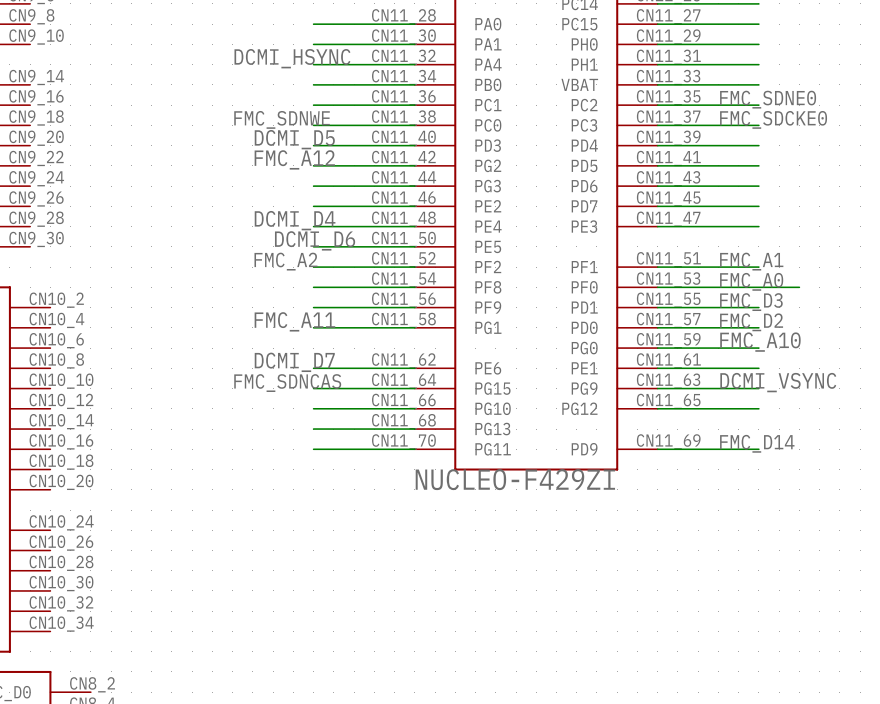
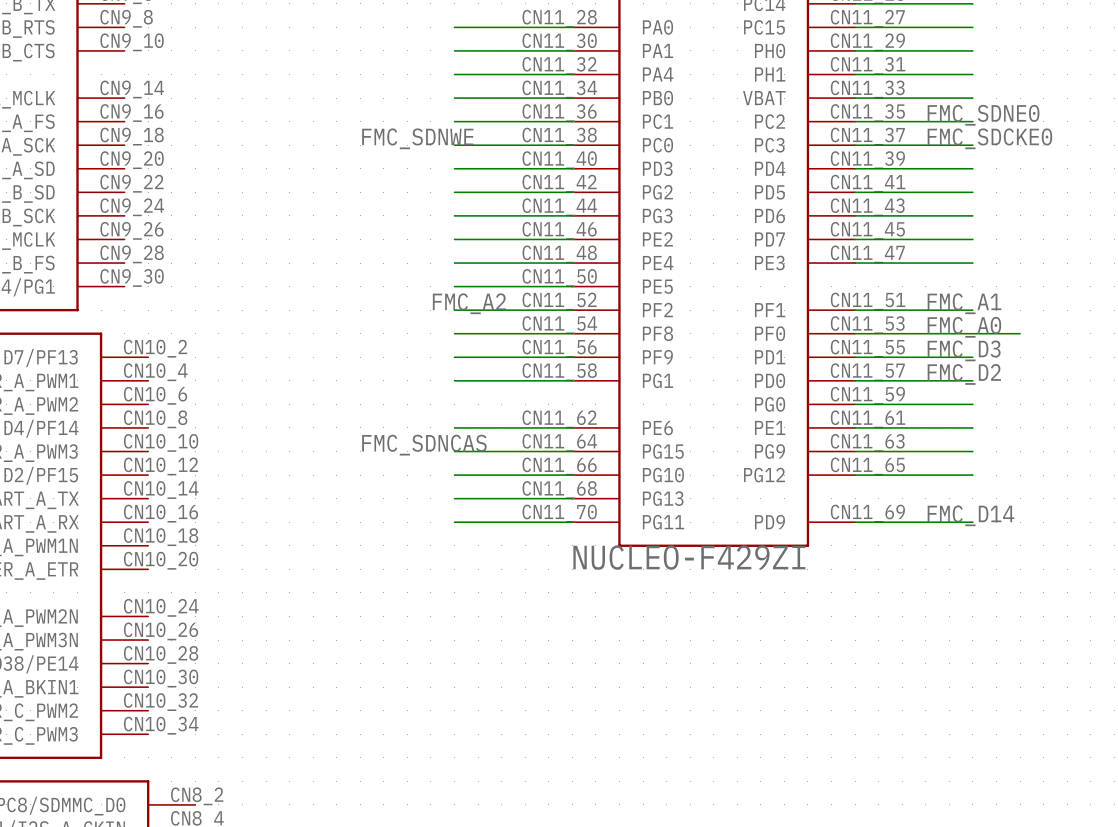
label: DCMI_HSYNC (292, 58) -> none
label: DCMI_D5 (294, 139) -> none
label: FMC_A12 (294, 159) -> none
label: DCMI_D4 (295, 220) -> none
label: DCMI_D6 (315, 240) -> none
label position: FMC_A2 (285, 261) -> FMC_A2 (469, 303)
label: FMC_A11 (294, 321) -> none
label: FMC_A10 (760, 342) -> none
label: DCMI_D7 (294, 362) -> none
label: DCMI_VSYNC (778, 382) -> none

